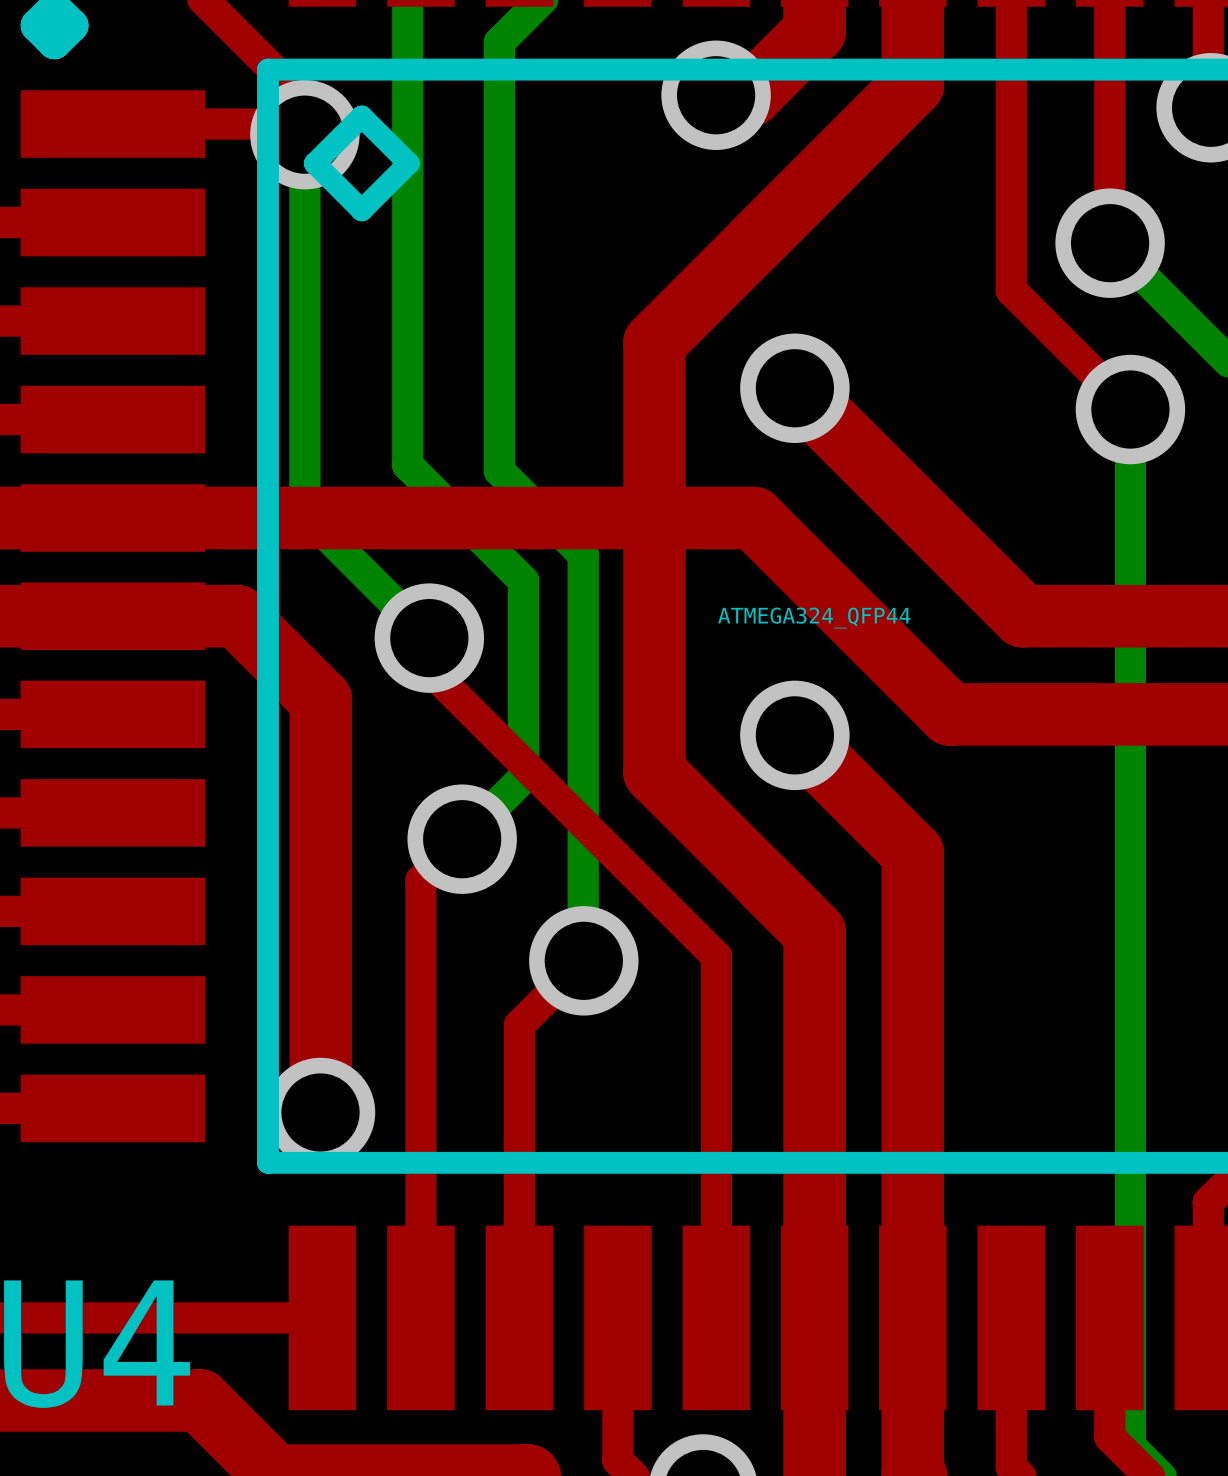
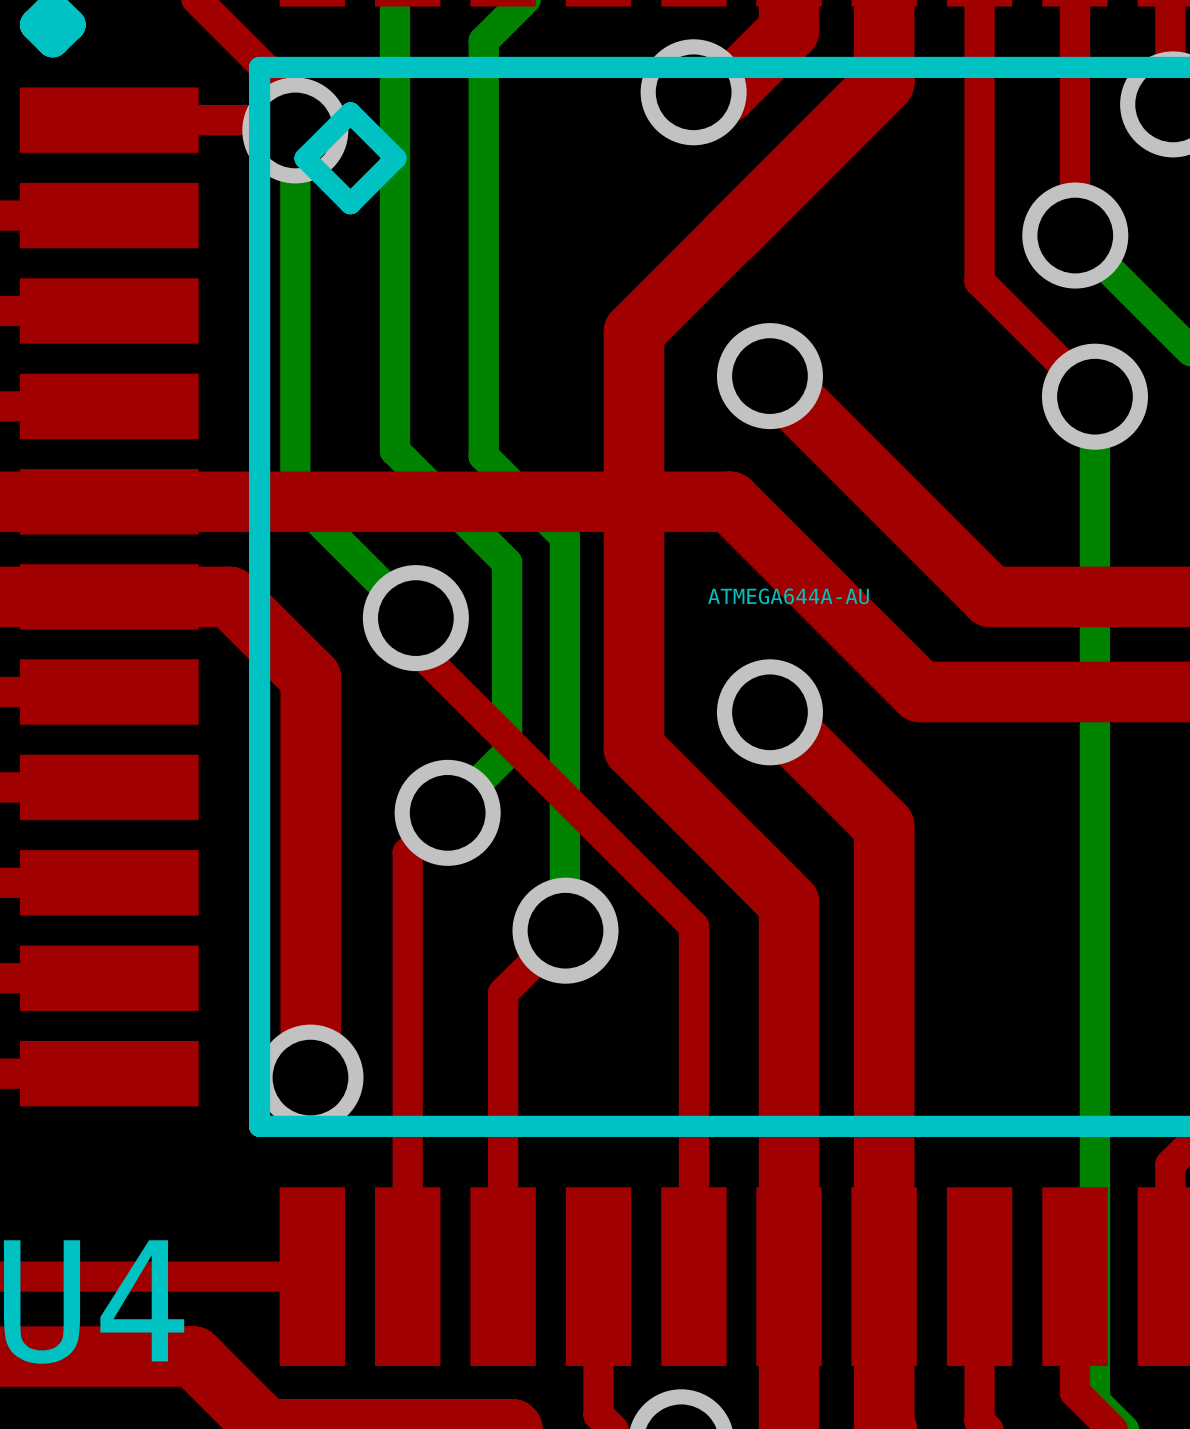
U4 value: ATMEGA324_QFP44 (814, 618) -> ATMEGA644A-AU (788, 596)

